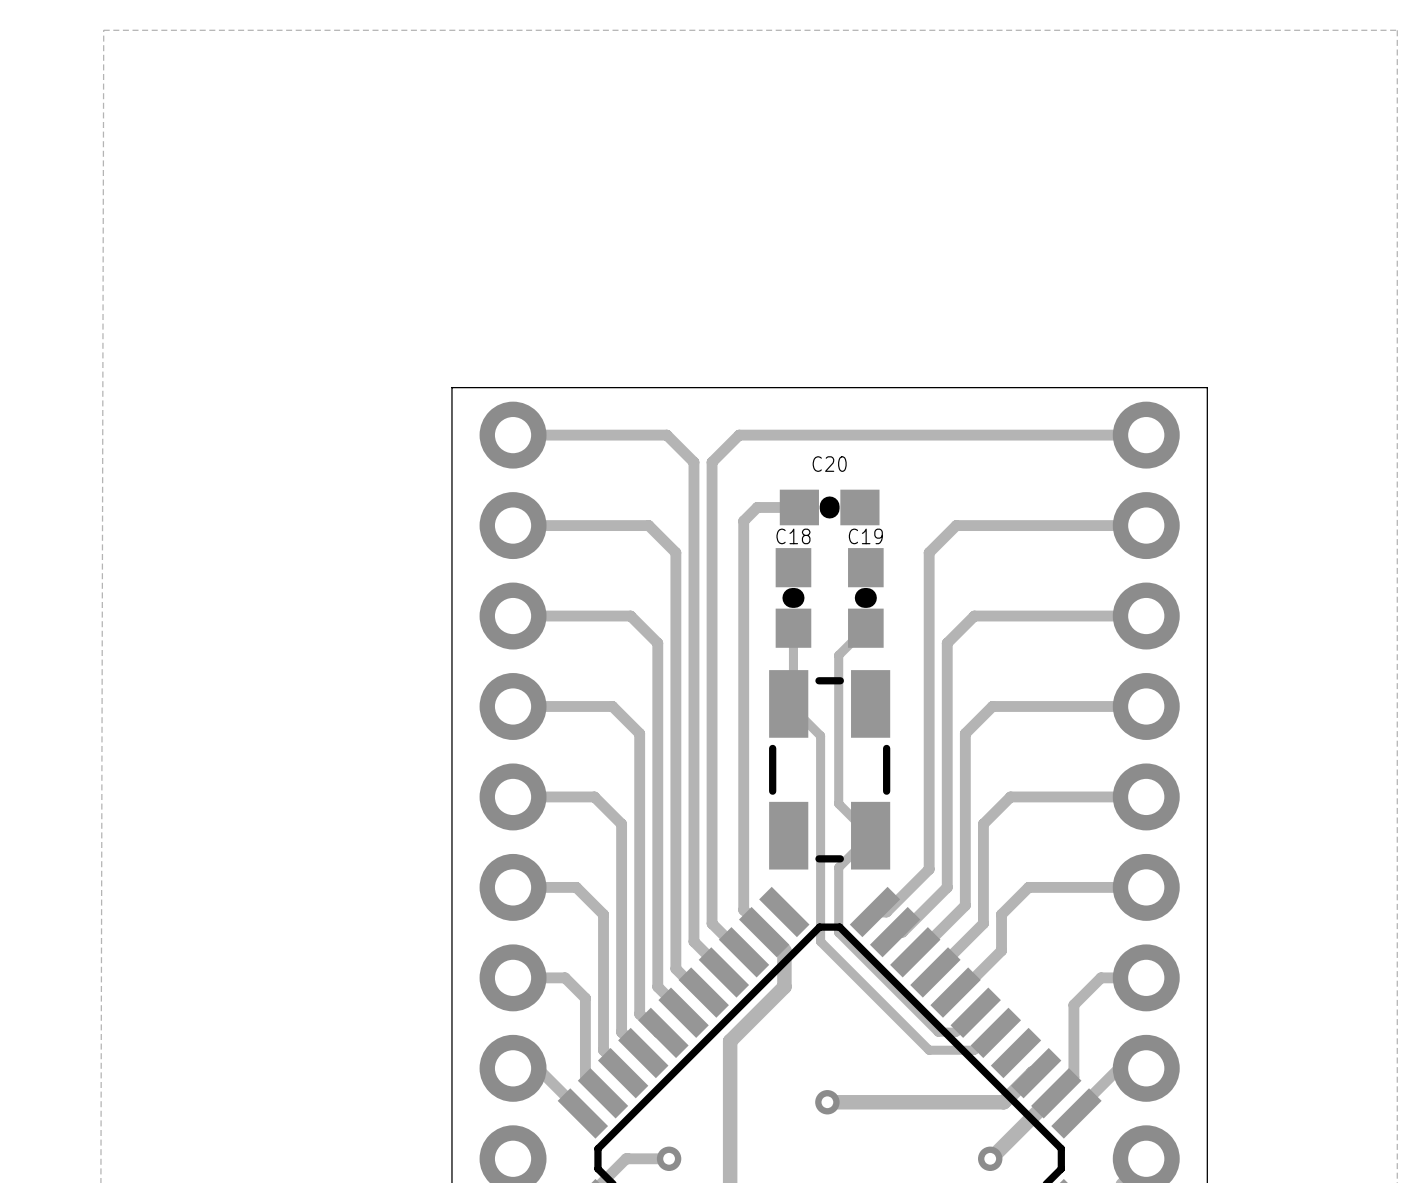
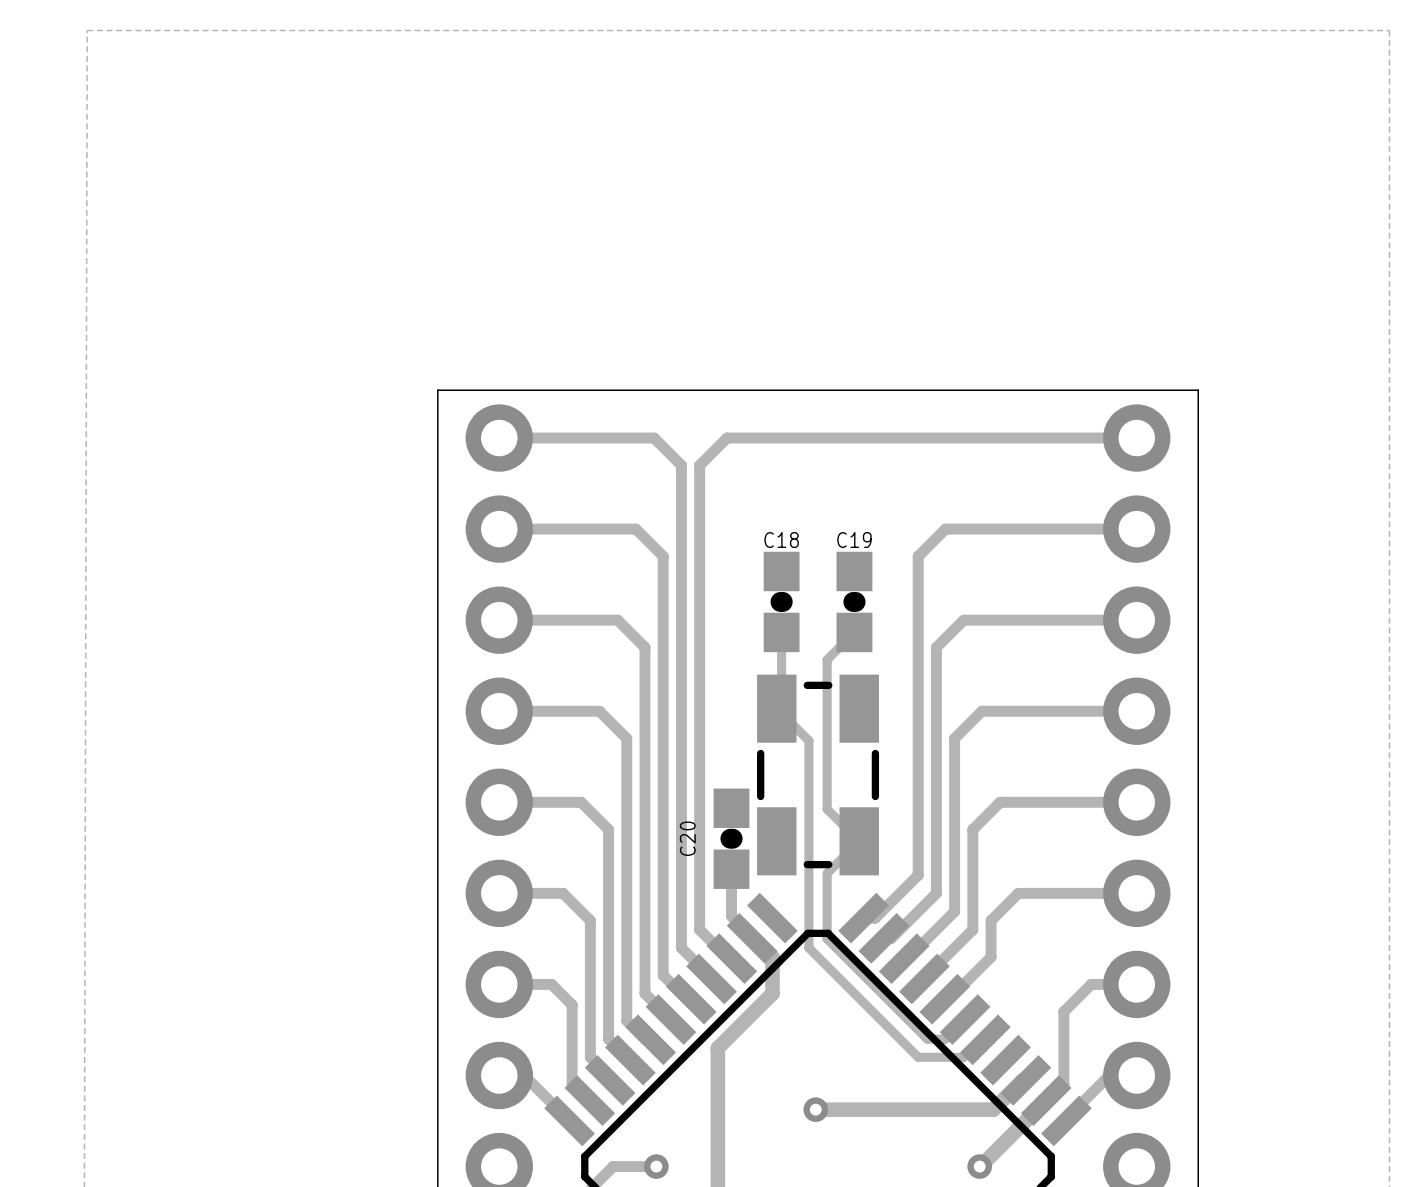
track: (799, 507) (757, 507) (743, 521) (743, 863) -> none
C20 rotation: 0° (829, 507) -> 90° clockwise (731, 838)
C20 position: (829, 507) -> (731, 838)

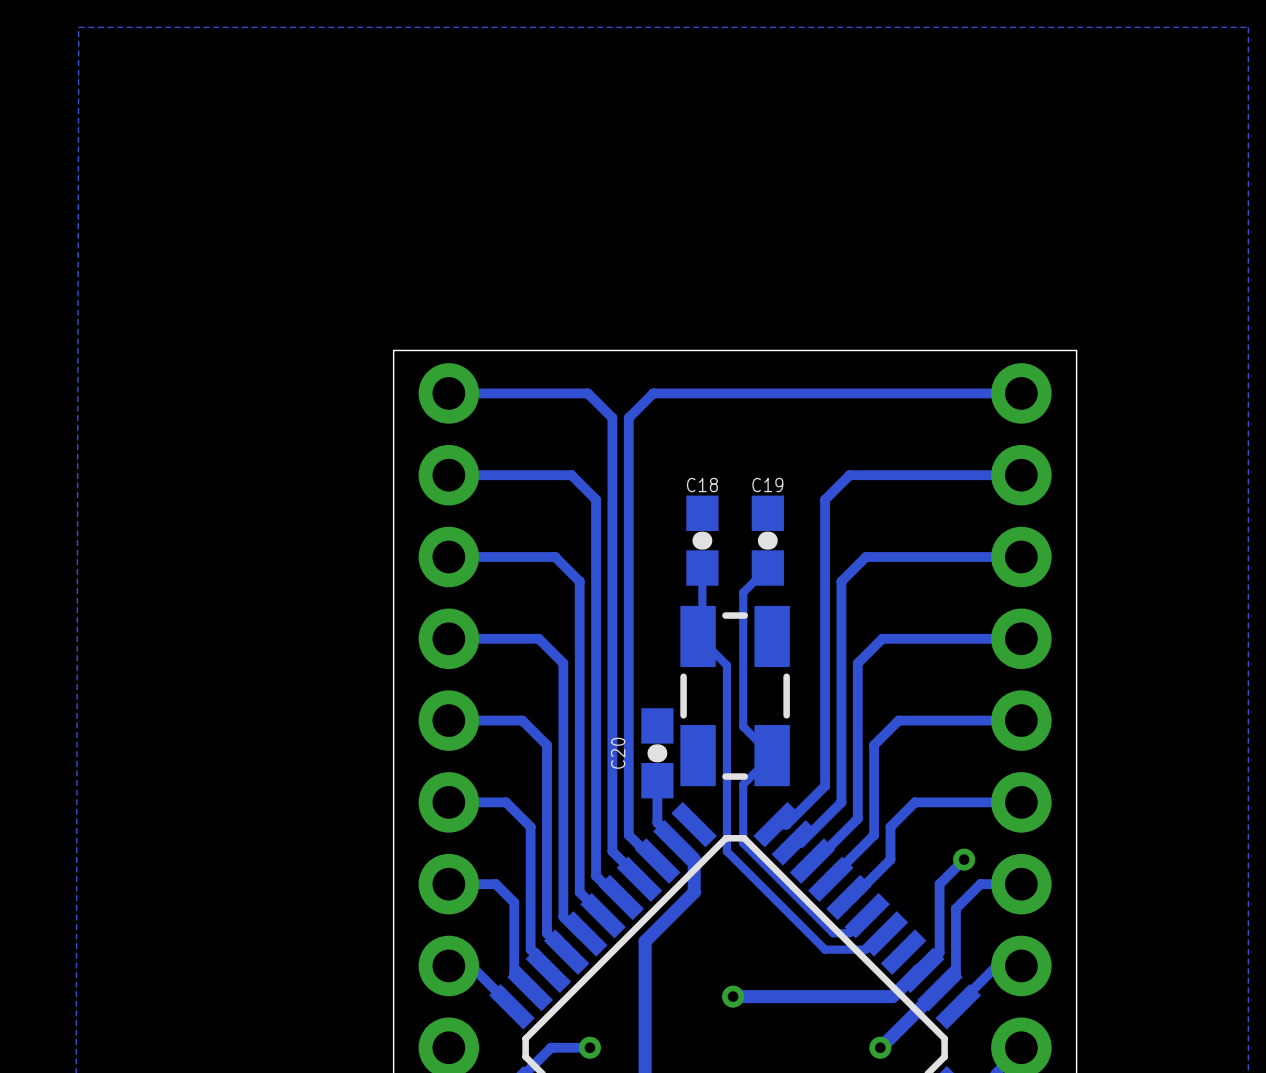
track: none -> (964, 859) (939, 884) (939, 952) (921, 970)
via: none -> (964, 859)

